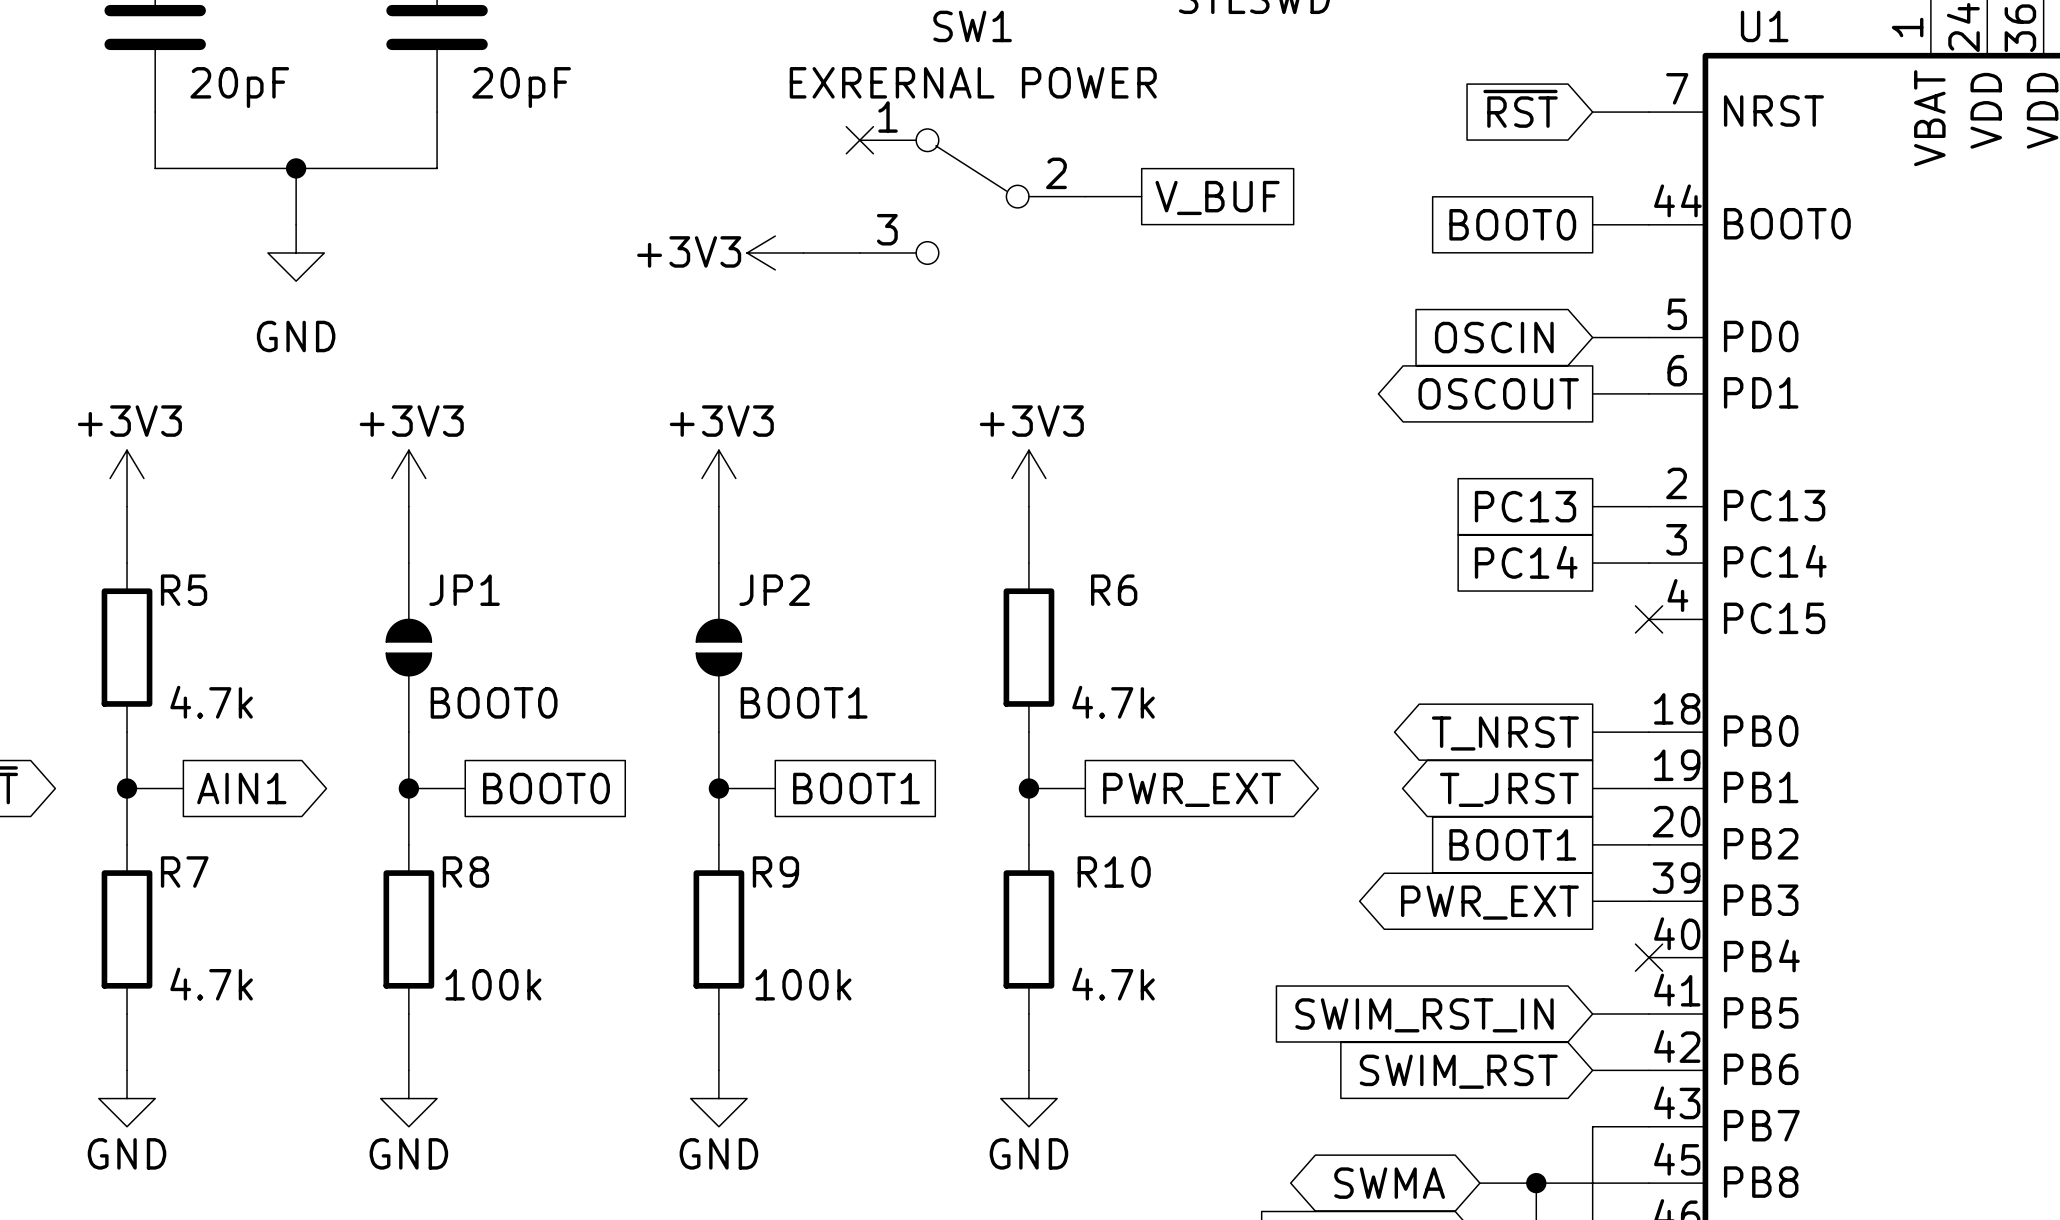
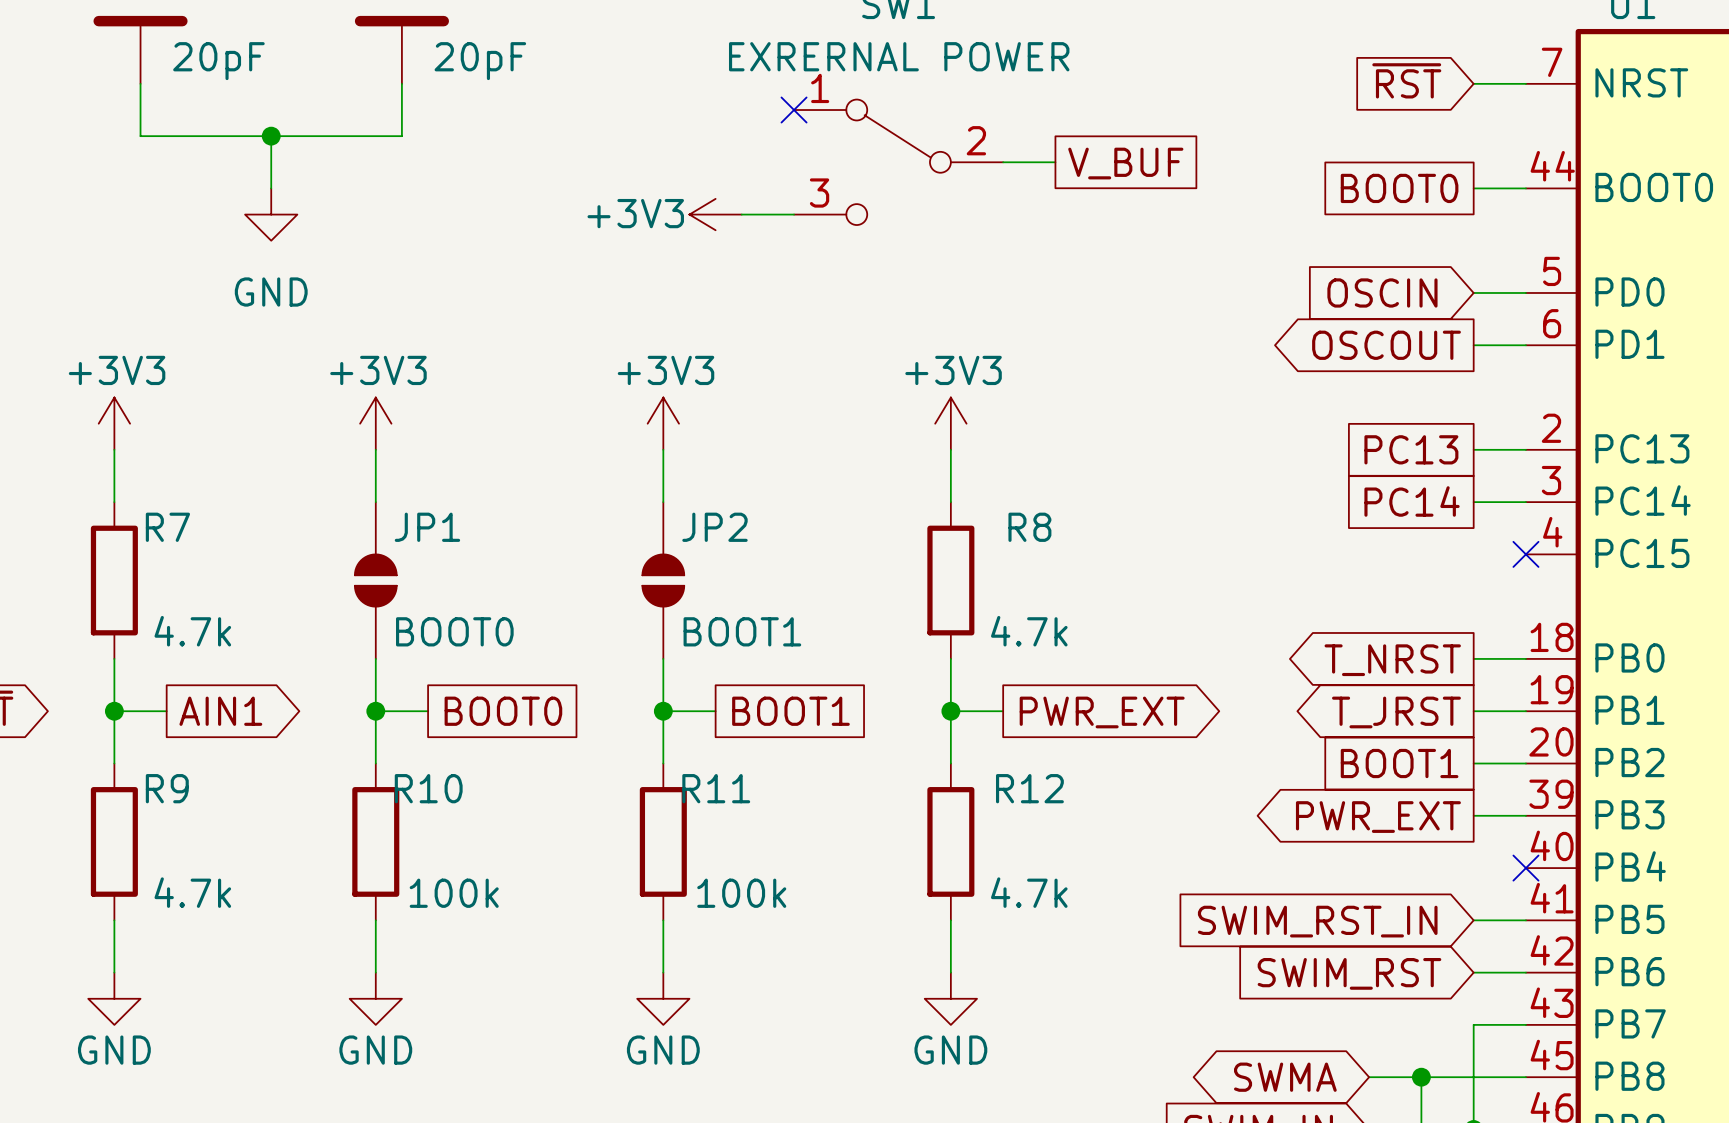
R5 name: R5 (184, 590) -> R7 (167, 527)
R6 name: R6 (1114, 590) -> R8 (1029, 527)
R7 name: R7 (184, 872) -> R9 (167, 788)
R8 name: R8 (465, 872) -> R10 (428, 788)
R9 name: R9 (775, 872) -> R11 (716, 788)
R10 name: R10 (1114, 872) -> R12 (1029, 788)

